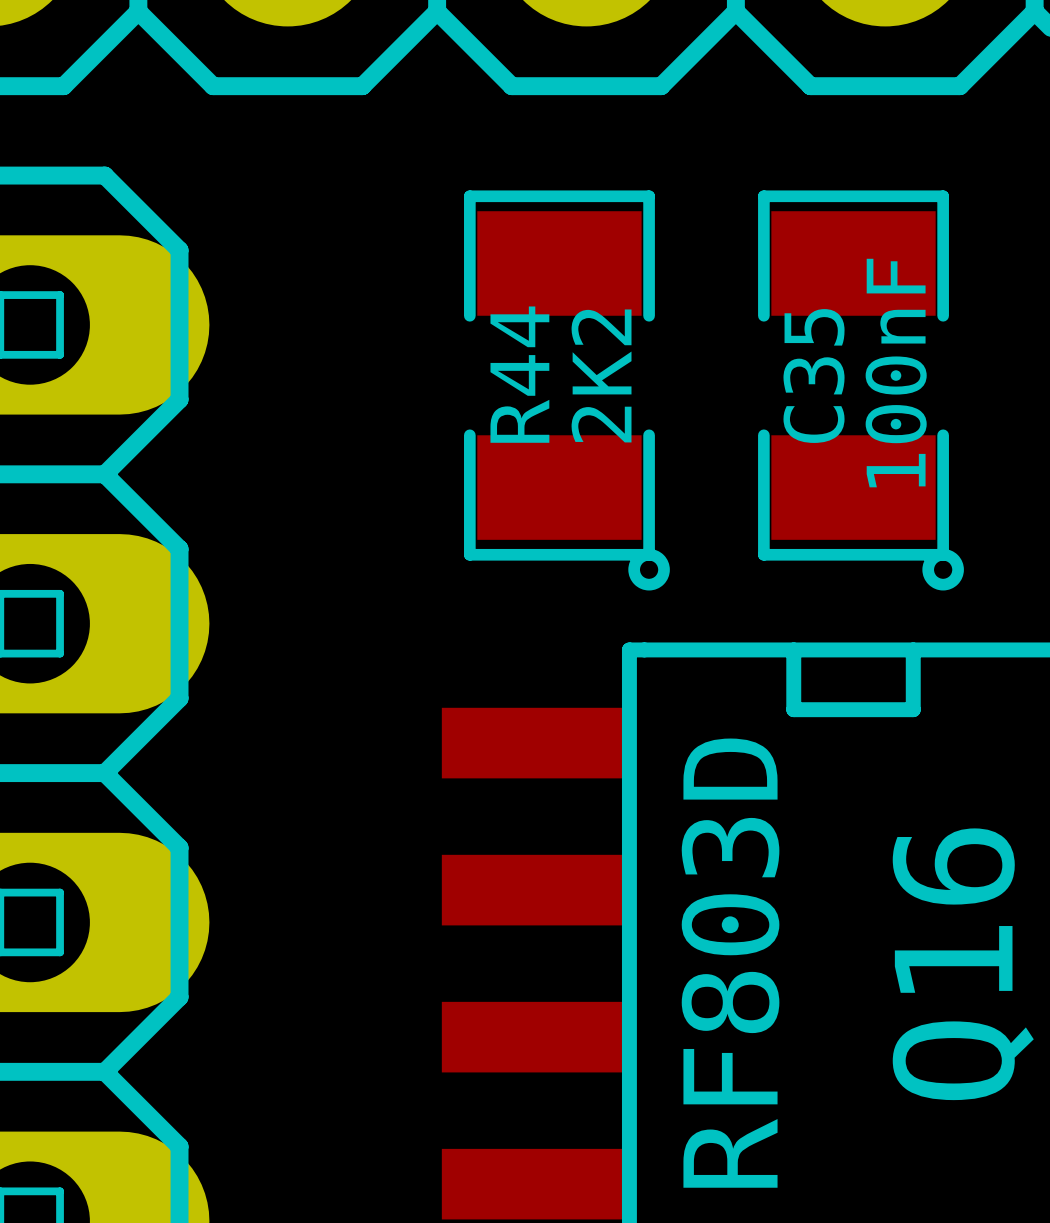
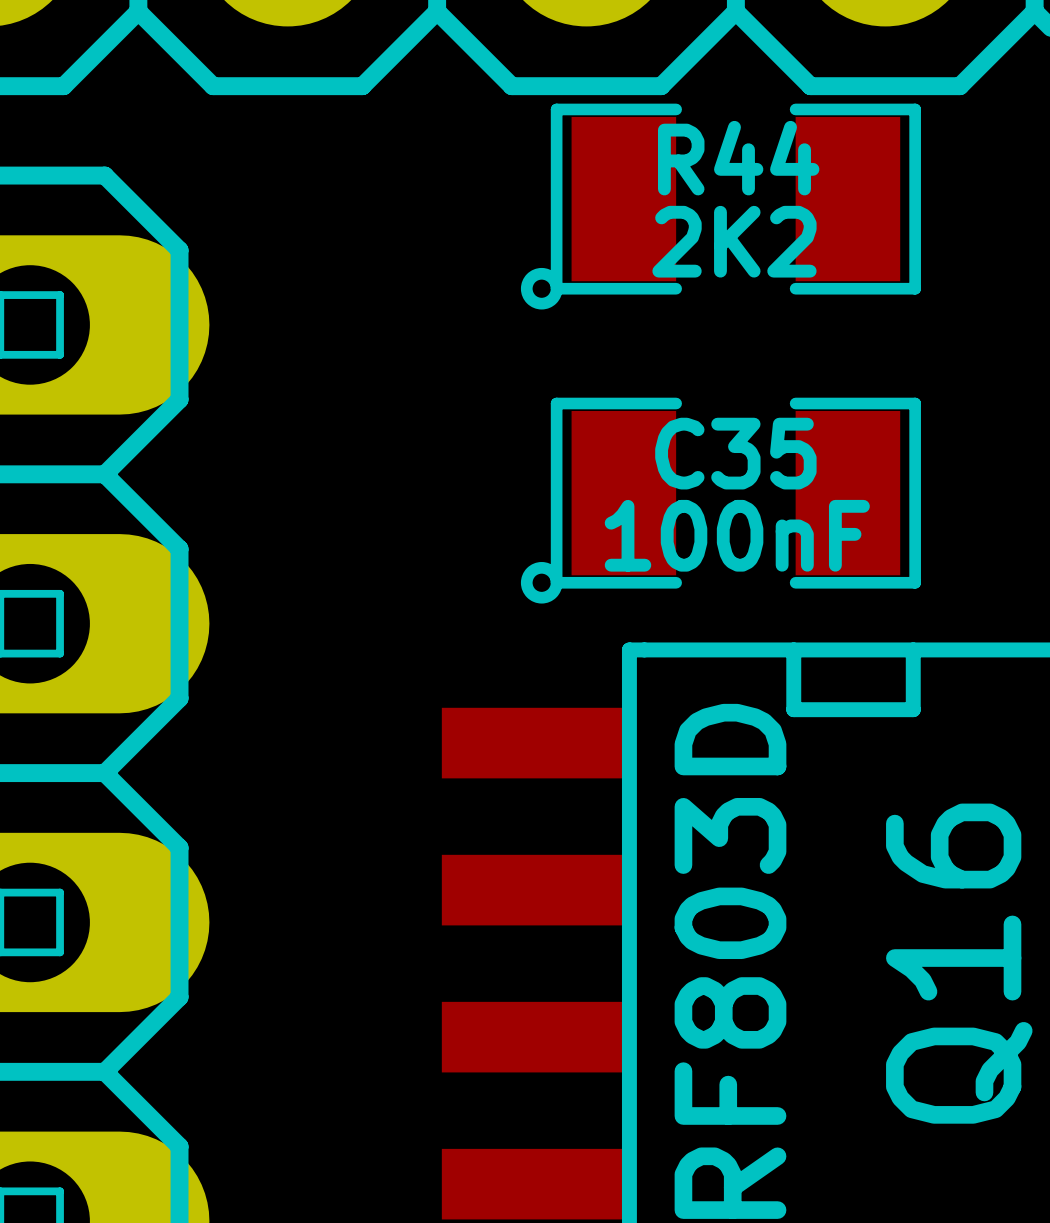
R44 rotation: 0° (566, 390) -> 90° clockwise (720, 206)
C35 rotation: 0° (860, 390) -> 90° clockwise (720, 500)

